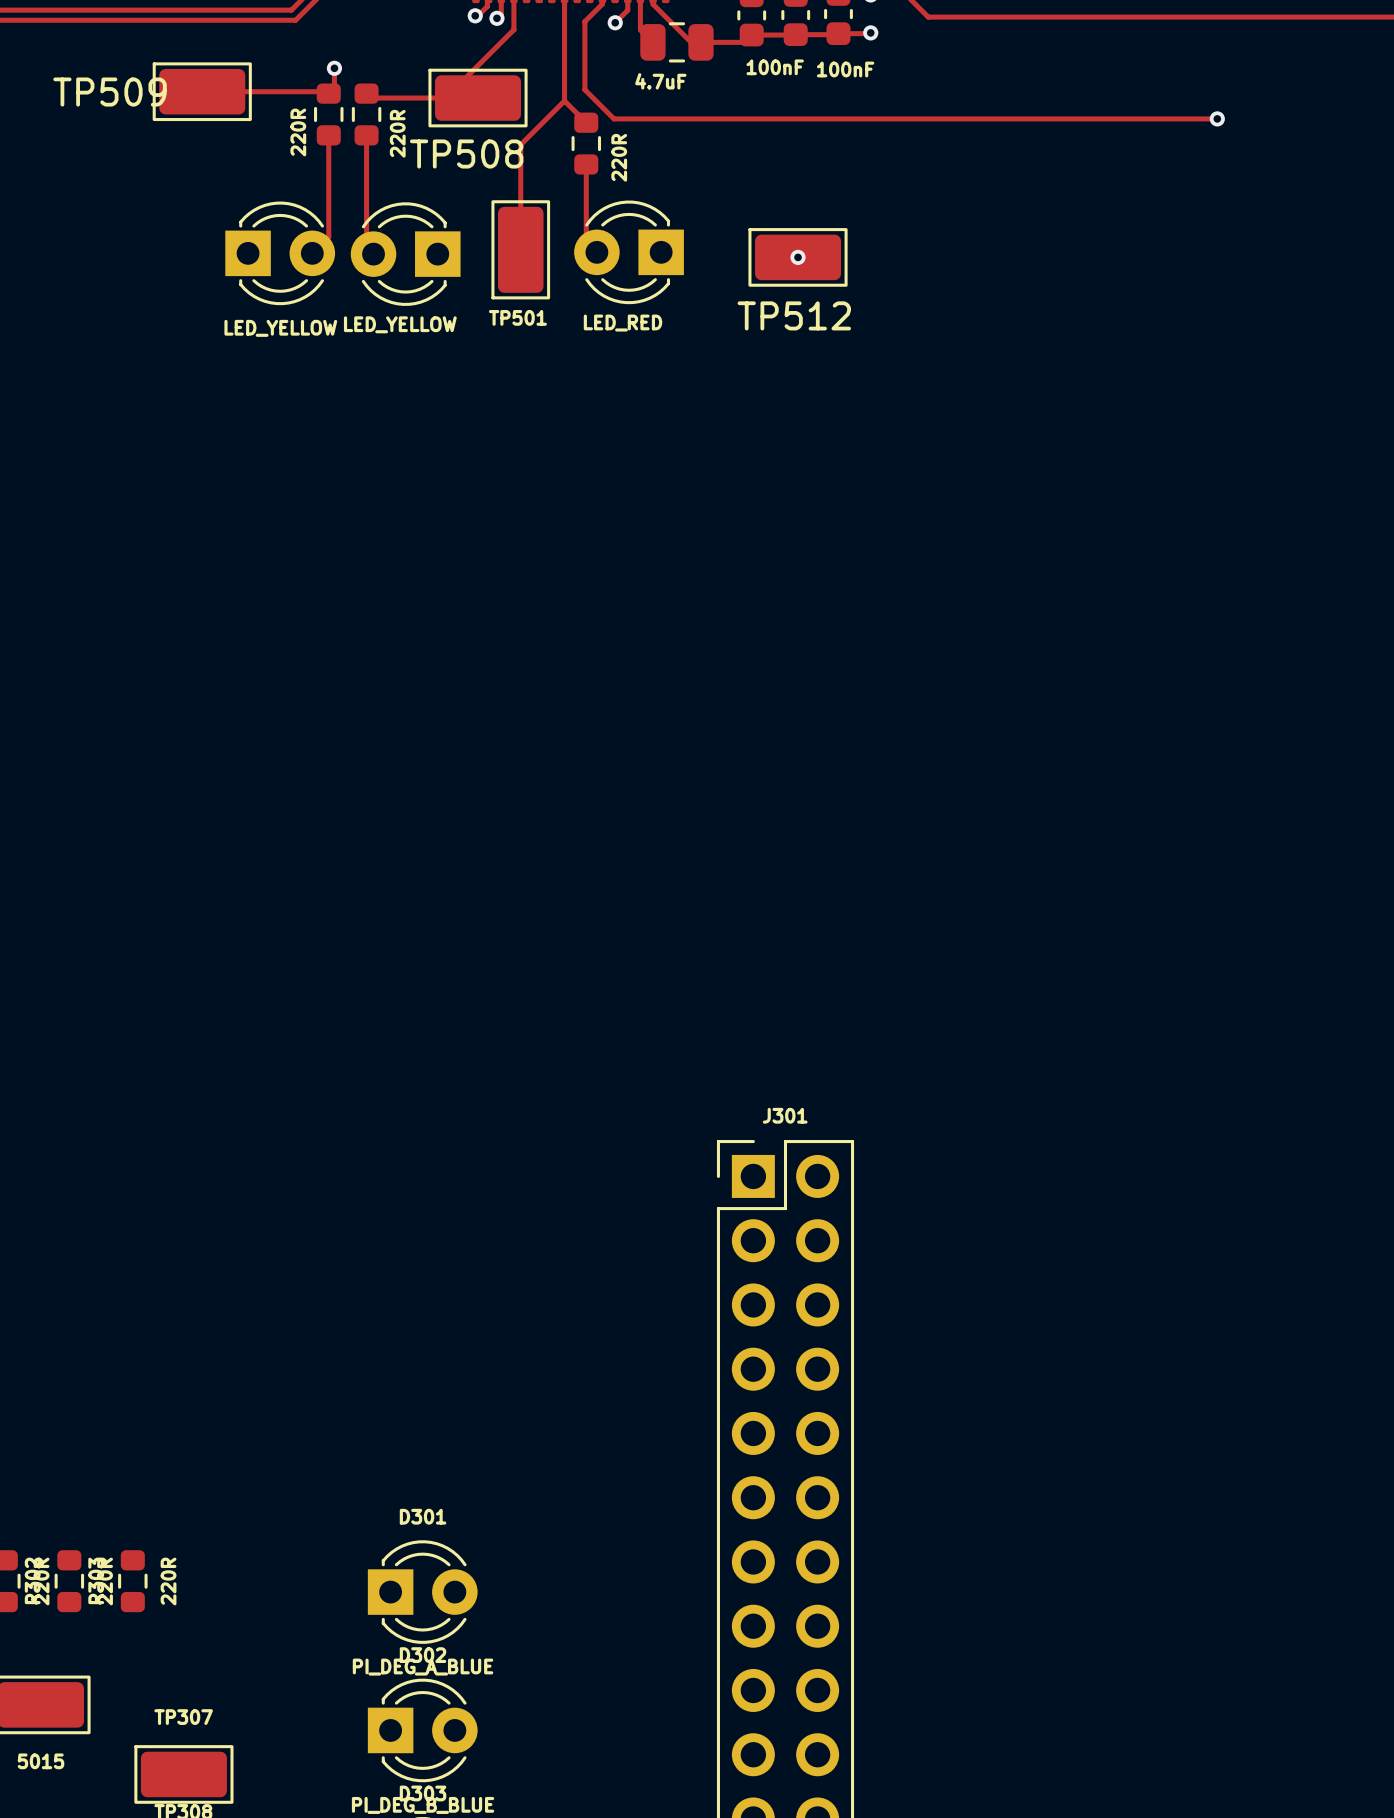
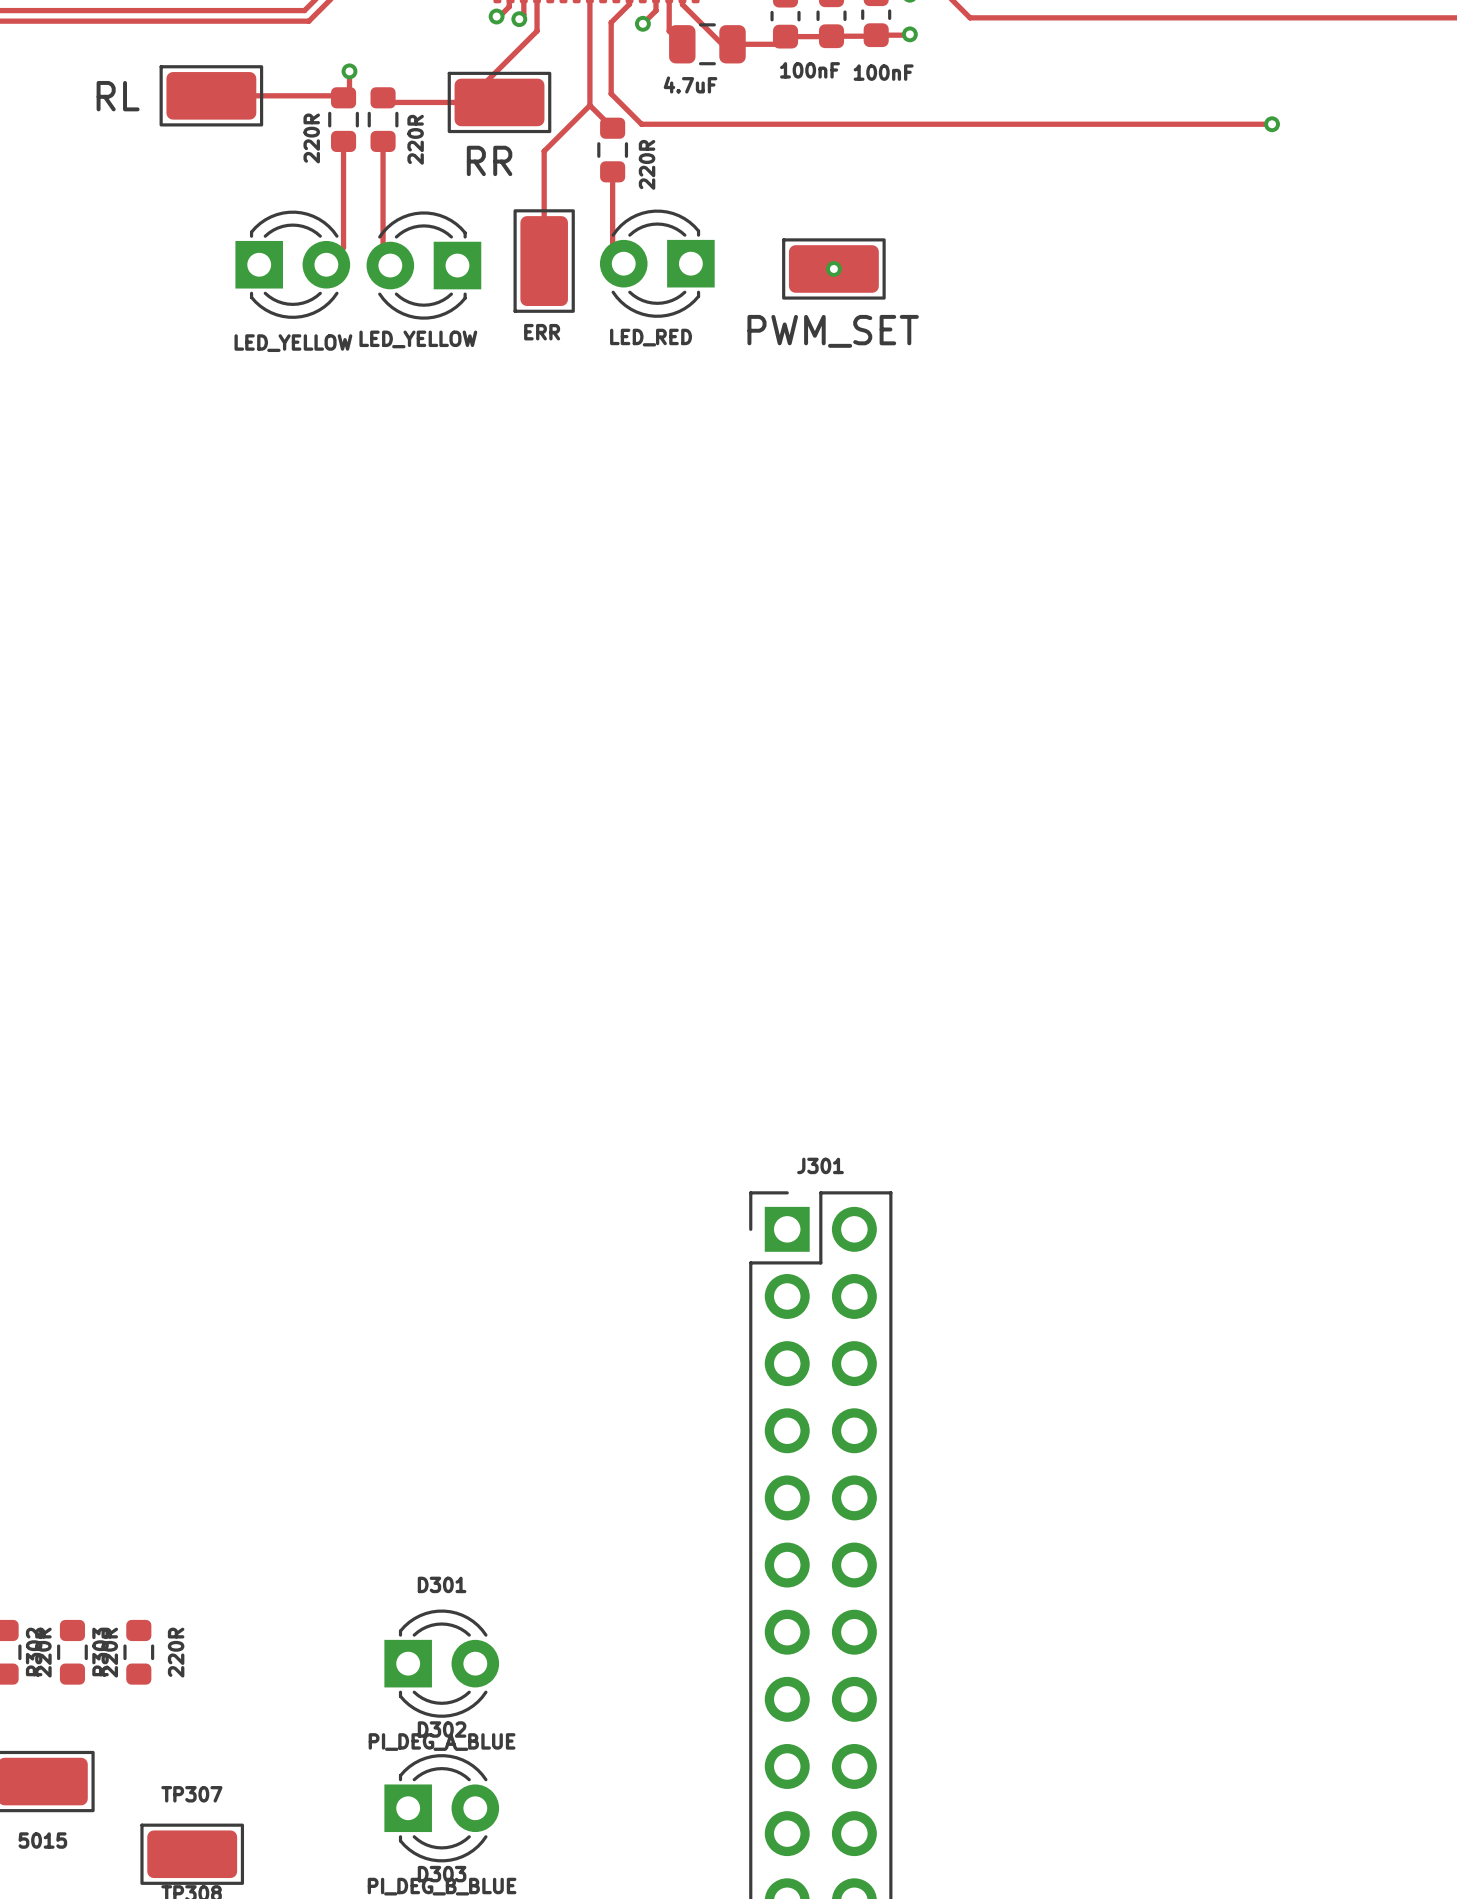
TP509 name: TP509 (110, 92) -> RL (118, 96)
TP508 name: TP508 (466, 154) -> RR (489, 160)
TP512 name: TP512 (794, 315) -> PWM_SET (833, 331)
TP501 name: TP501 (517, 317) -> ERR (542, 332)

